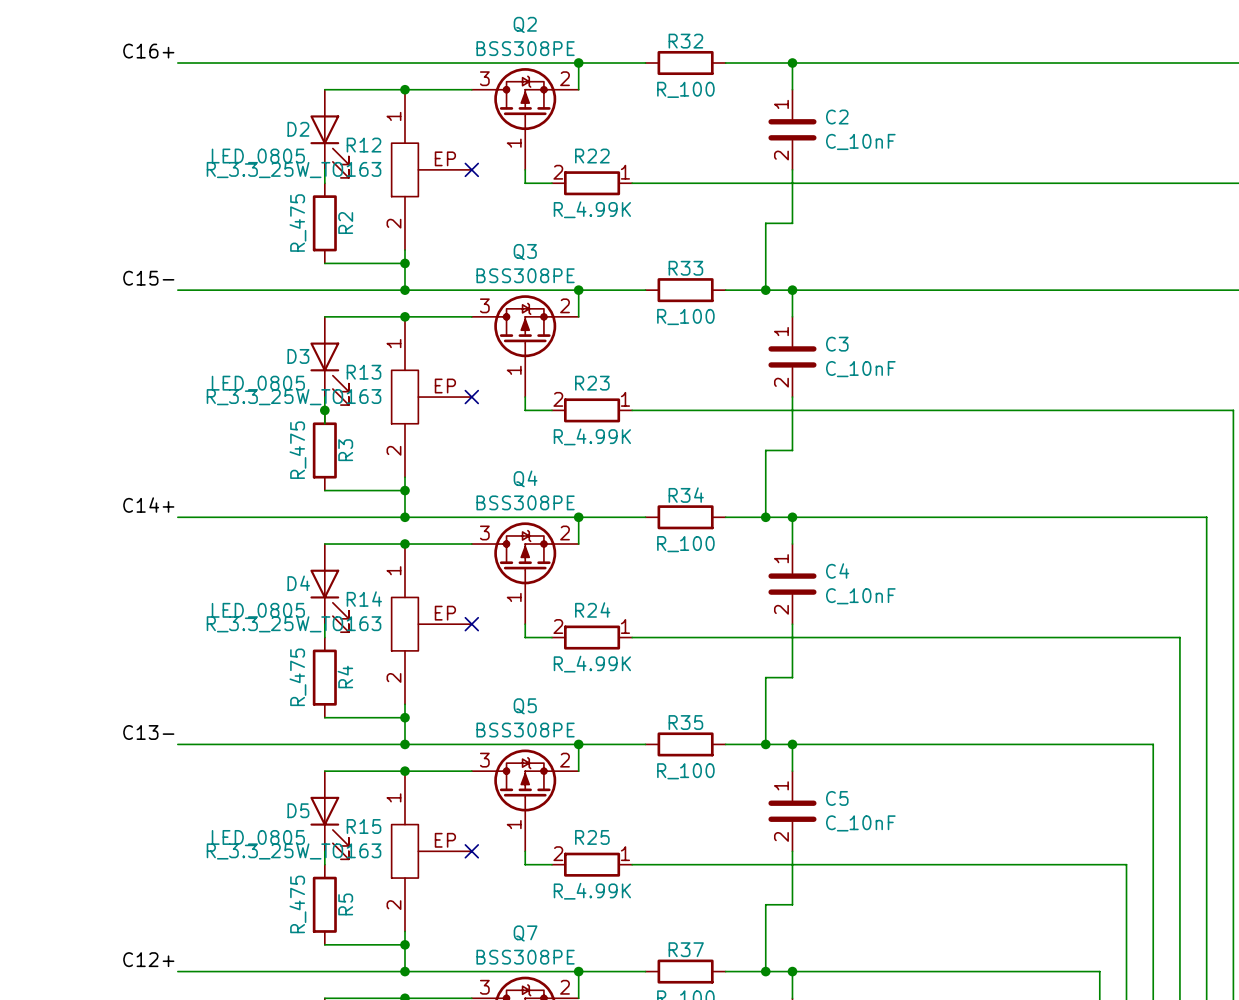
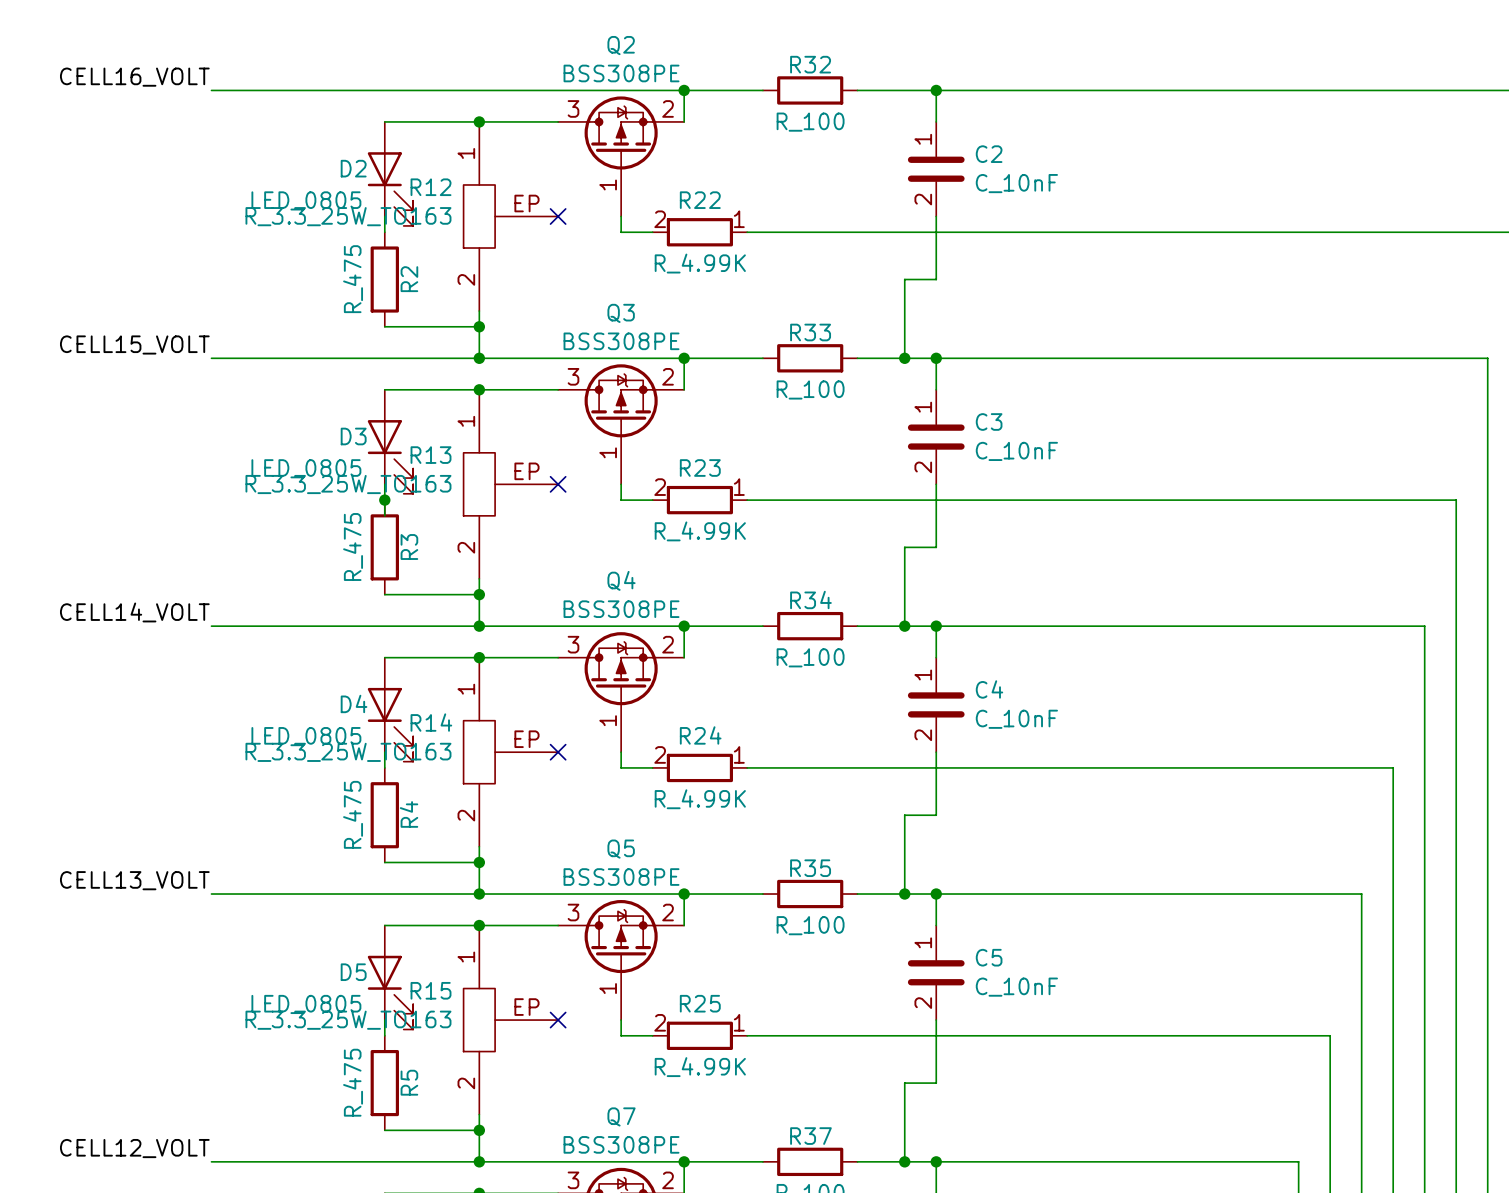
label: C16+ (148, 51) -> CELL16_VOLT (134, 77)
label: C15- (148, 278) -> CELL15_VOLT (134, 344)
label: C14+ (148, 505) -> CELL14_VOLT (134, 612)
label: C13- (148, 732) -> CELL13_VOLT (134, 880)
label: C12+ (148, 959) -> CELL12_VOLT (134, 1148)

